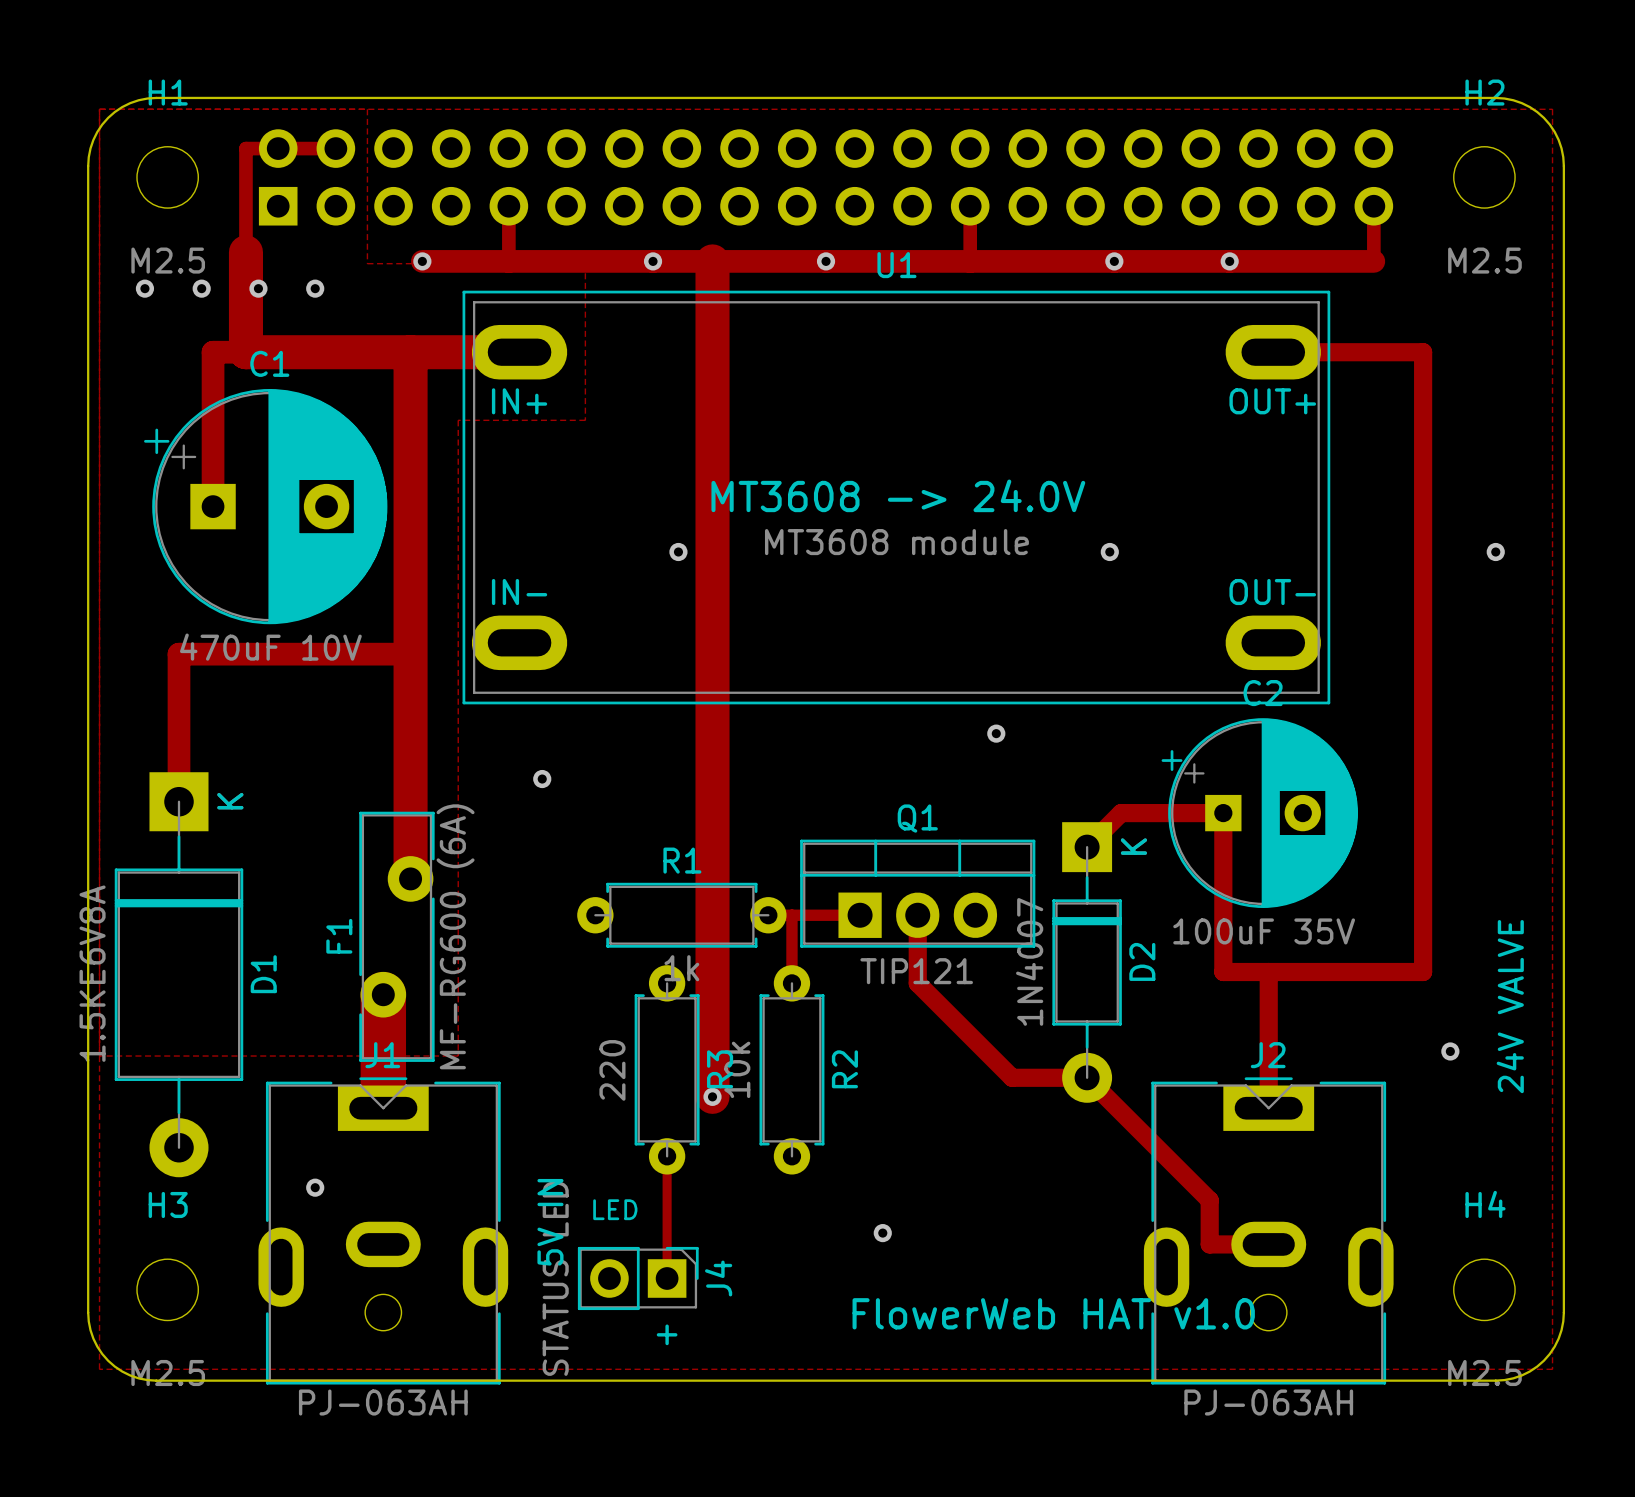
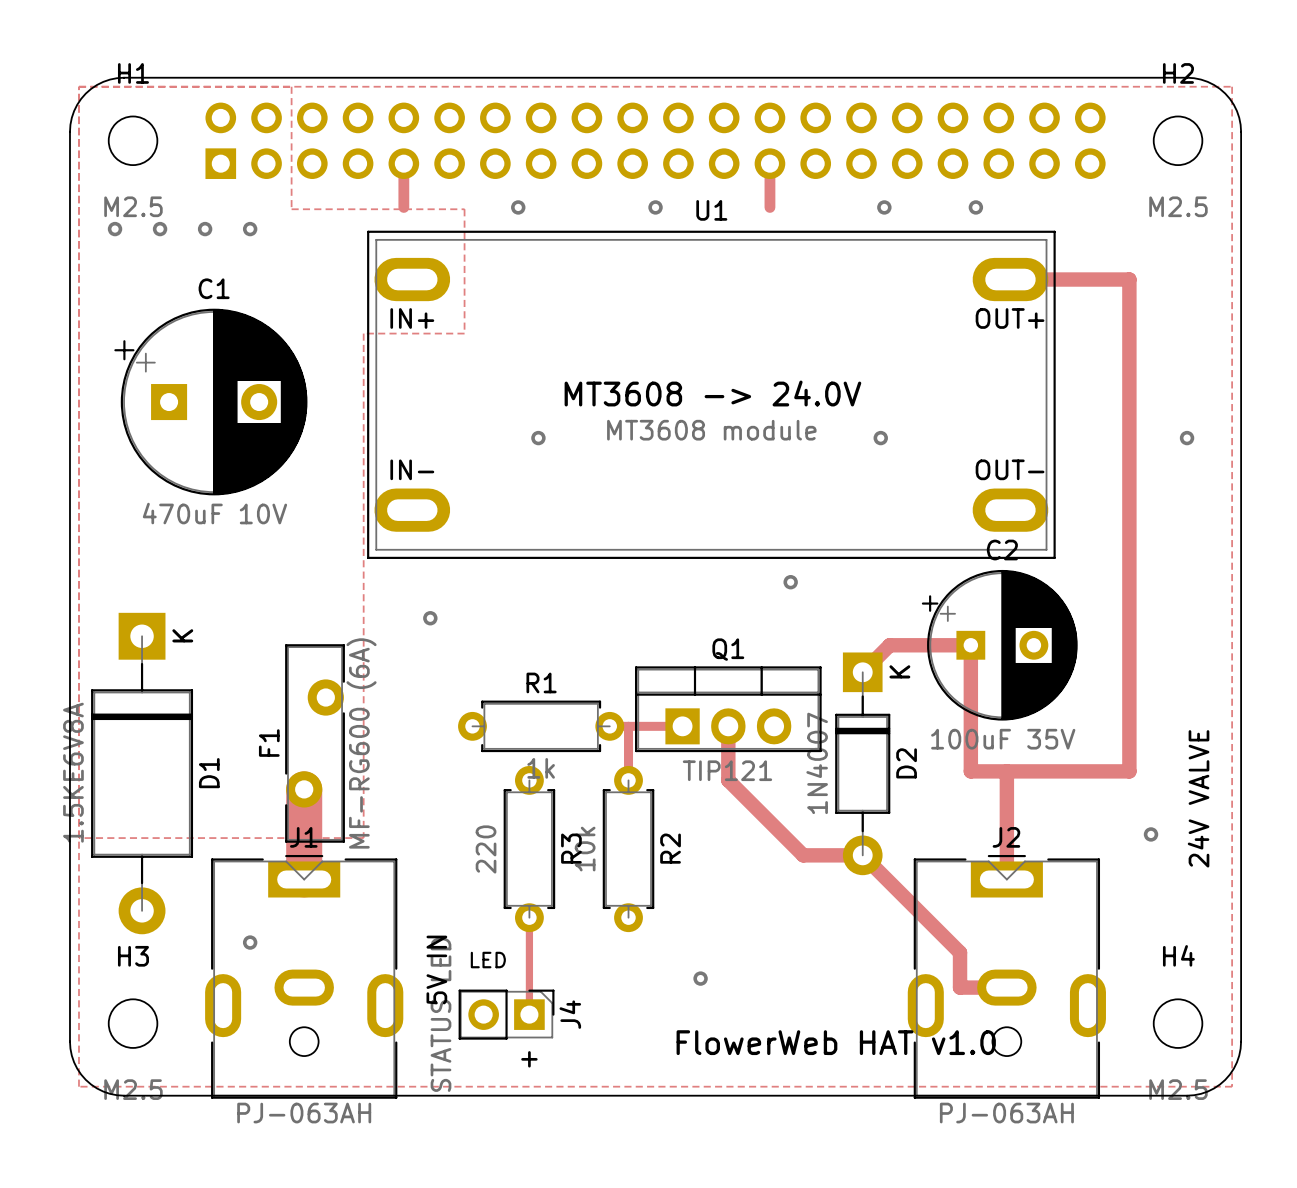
track: (335, 148) (245, 148) (245, 352) -> none
track: (1373, 206) (1373, 261) (422, 261) -> none
via: (422, 261) -> none
track: (712, 261) (712, 1096) -> none
track: (245, 352) (519, 352) -> none
track: (245, 352) (213, 352) (213, 506) -> none
track: (410, 352) (410, 878) -> none
track: (410, 654) (178, 654) (178, 801) -> none
via: (712, 1096) -> none

